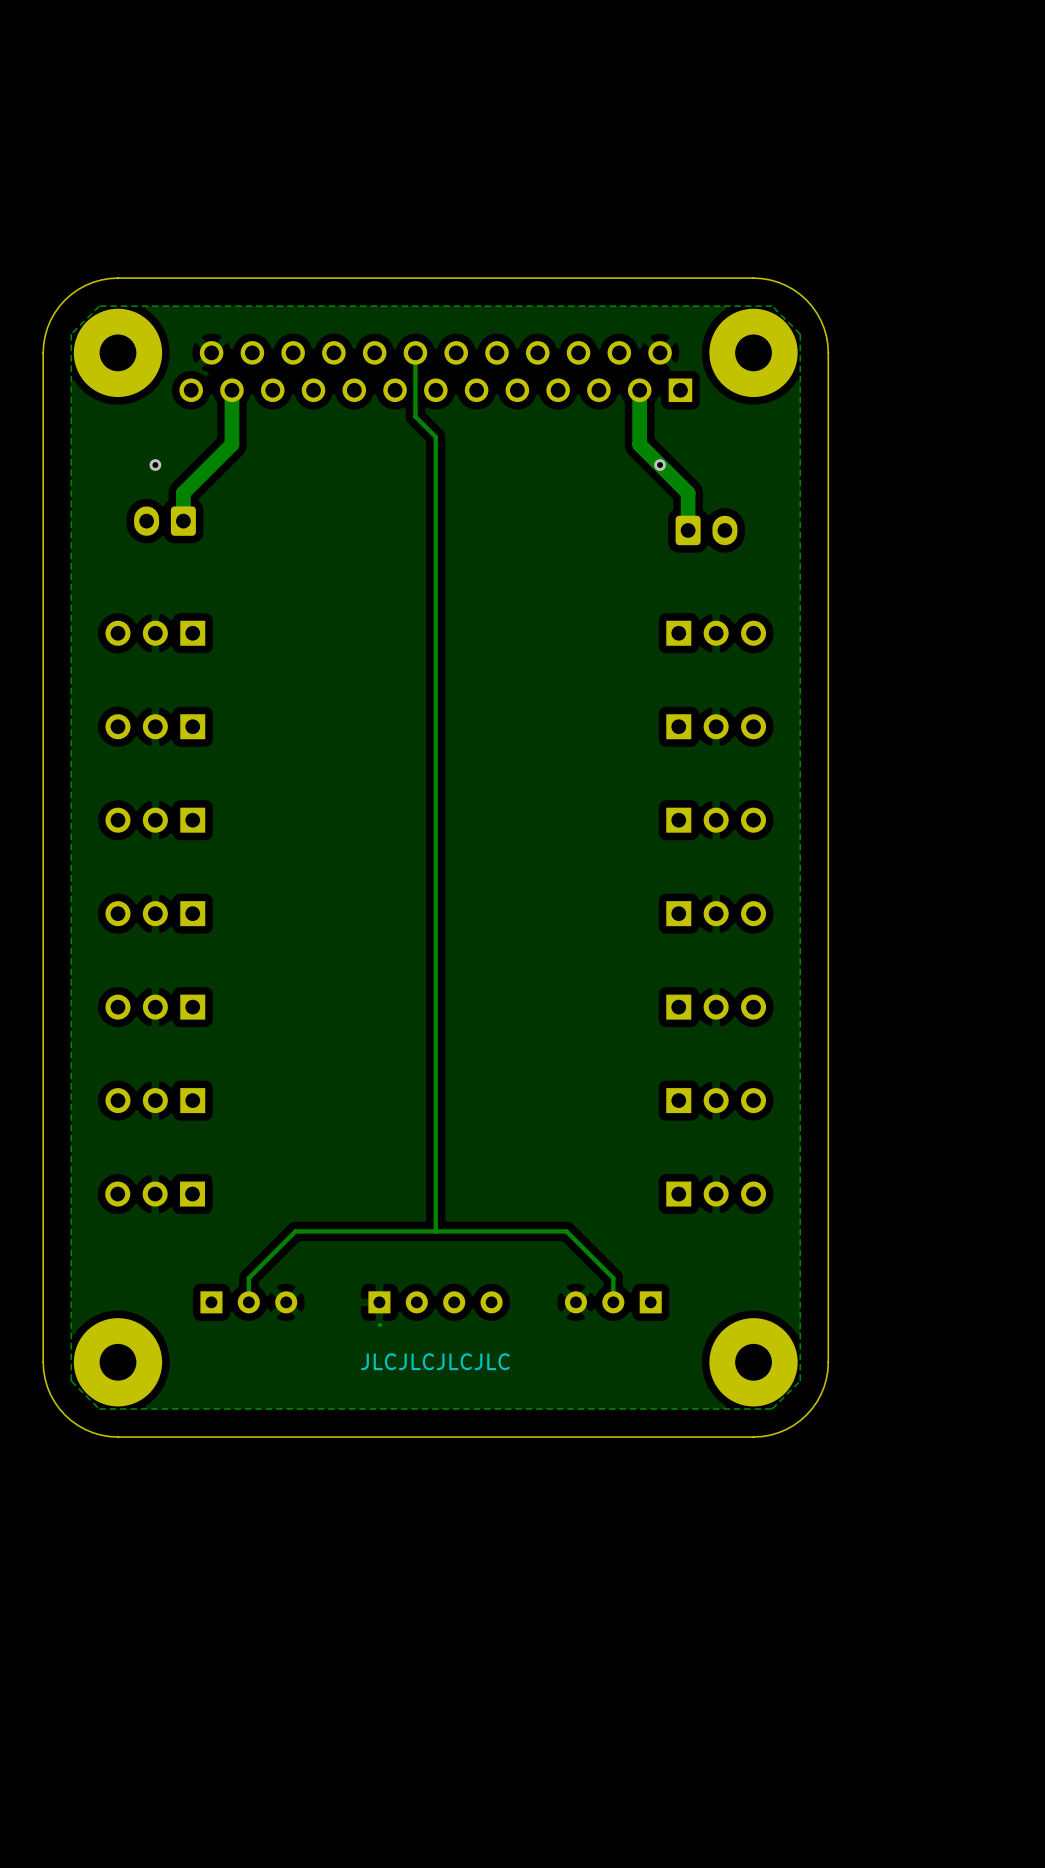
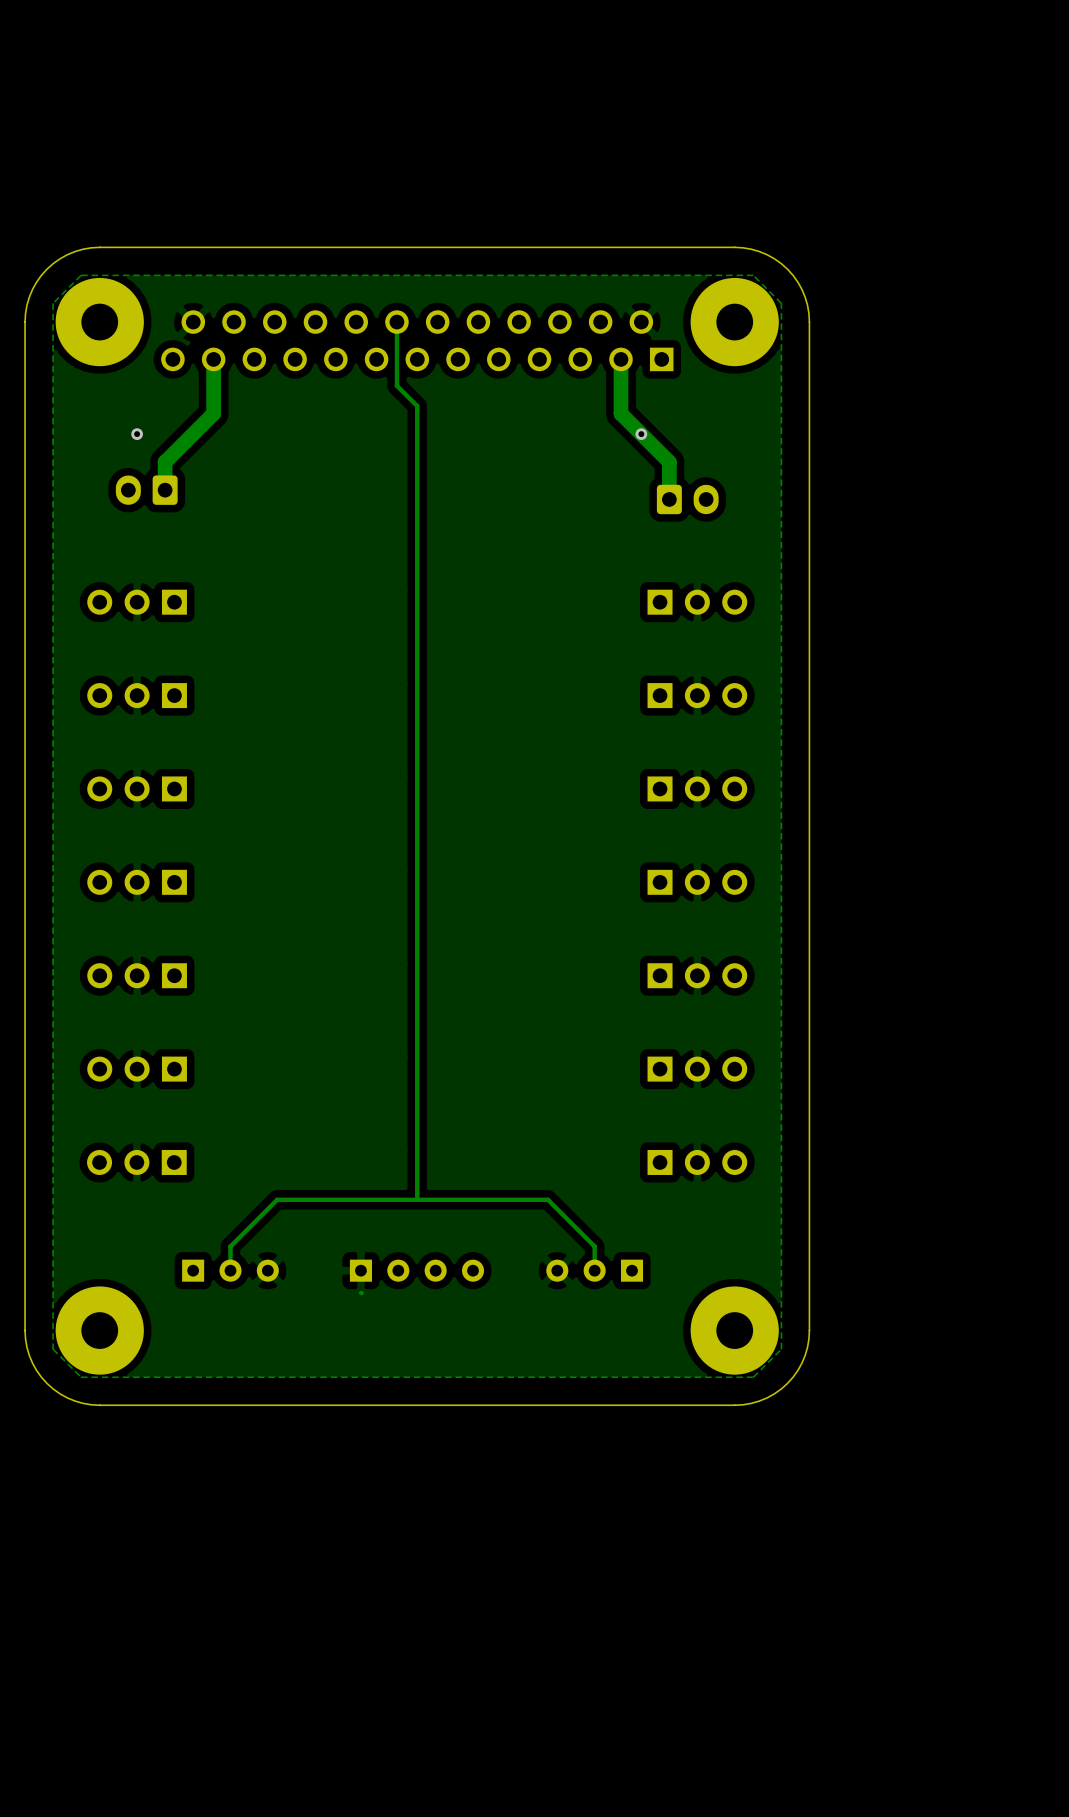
text: JLCJLCJLCJLC (435, 1361) -> none

